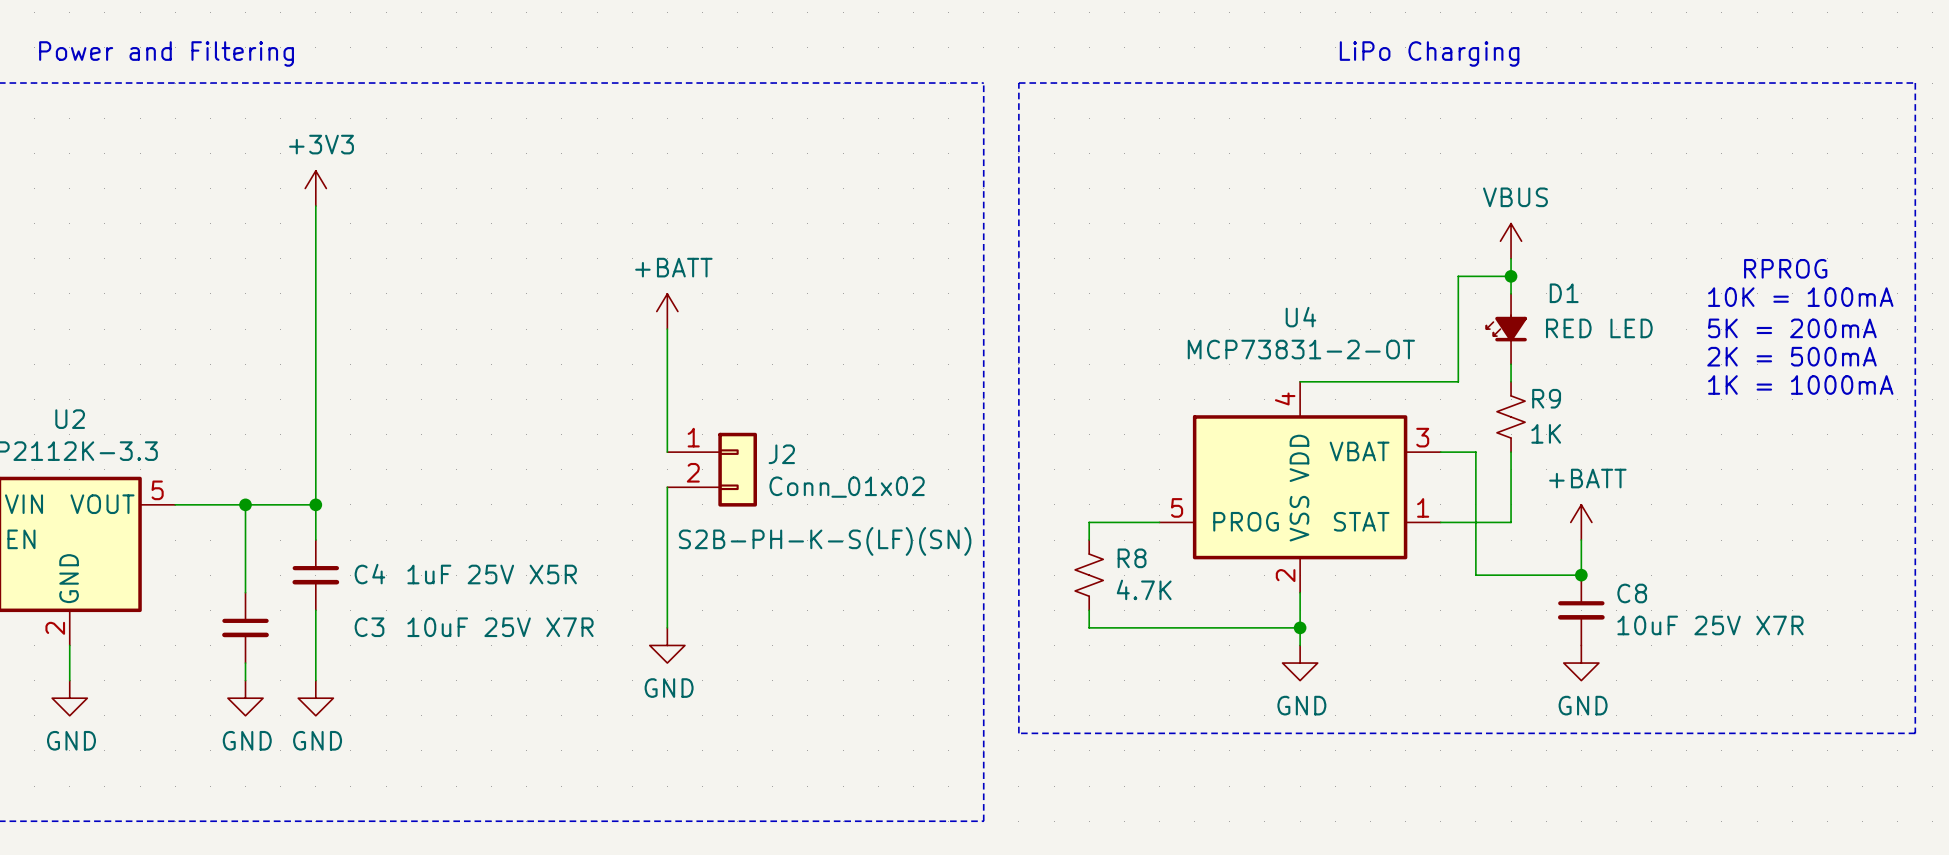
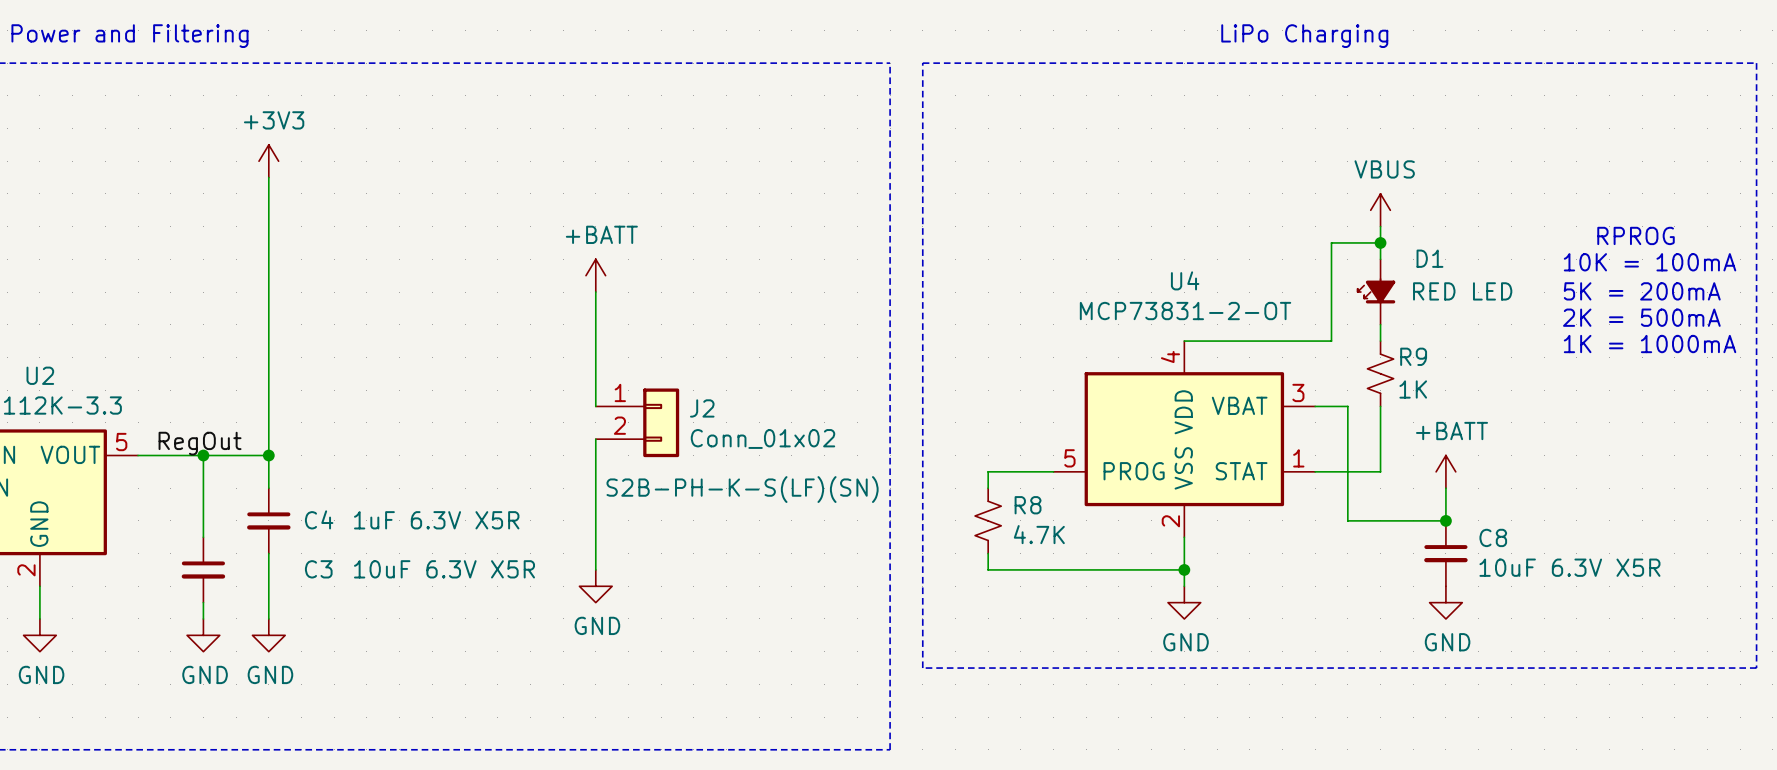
label: none -> RegOut (200, 443)
C4 value: 1uF 25V X5R (492, 574) -> 1uF 6.3V X5R (436, 520)
C8 value: 10uF 25V X7R (1710, 625) -> 10uF 6.3V X5R (1569, 567)
C3 value: 10uF 25V X7R (500, 627) -> 10uF 6.3V X5R (444, 569)

